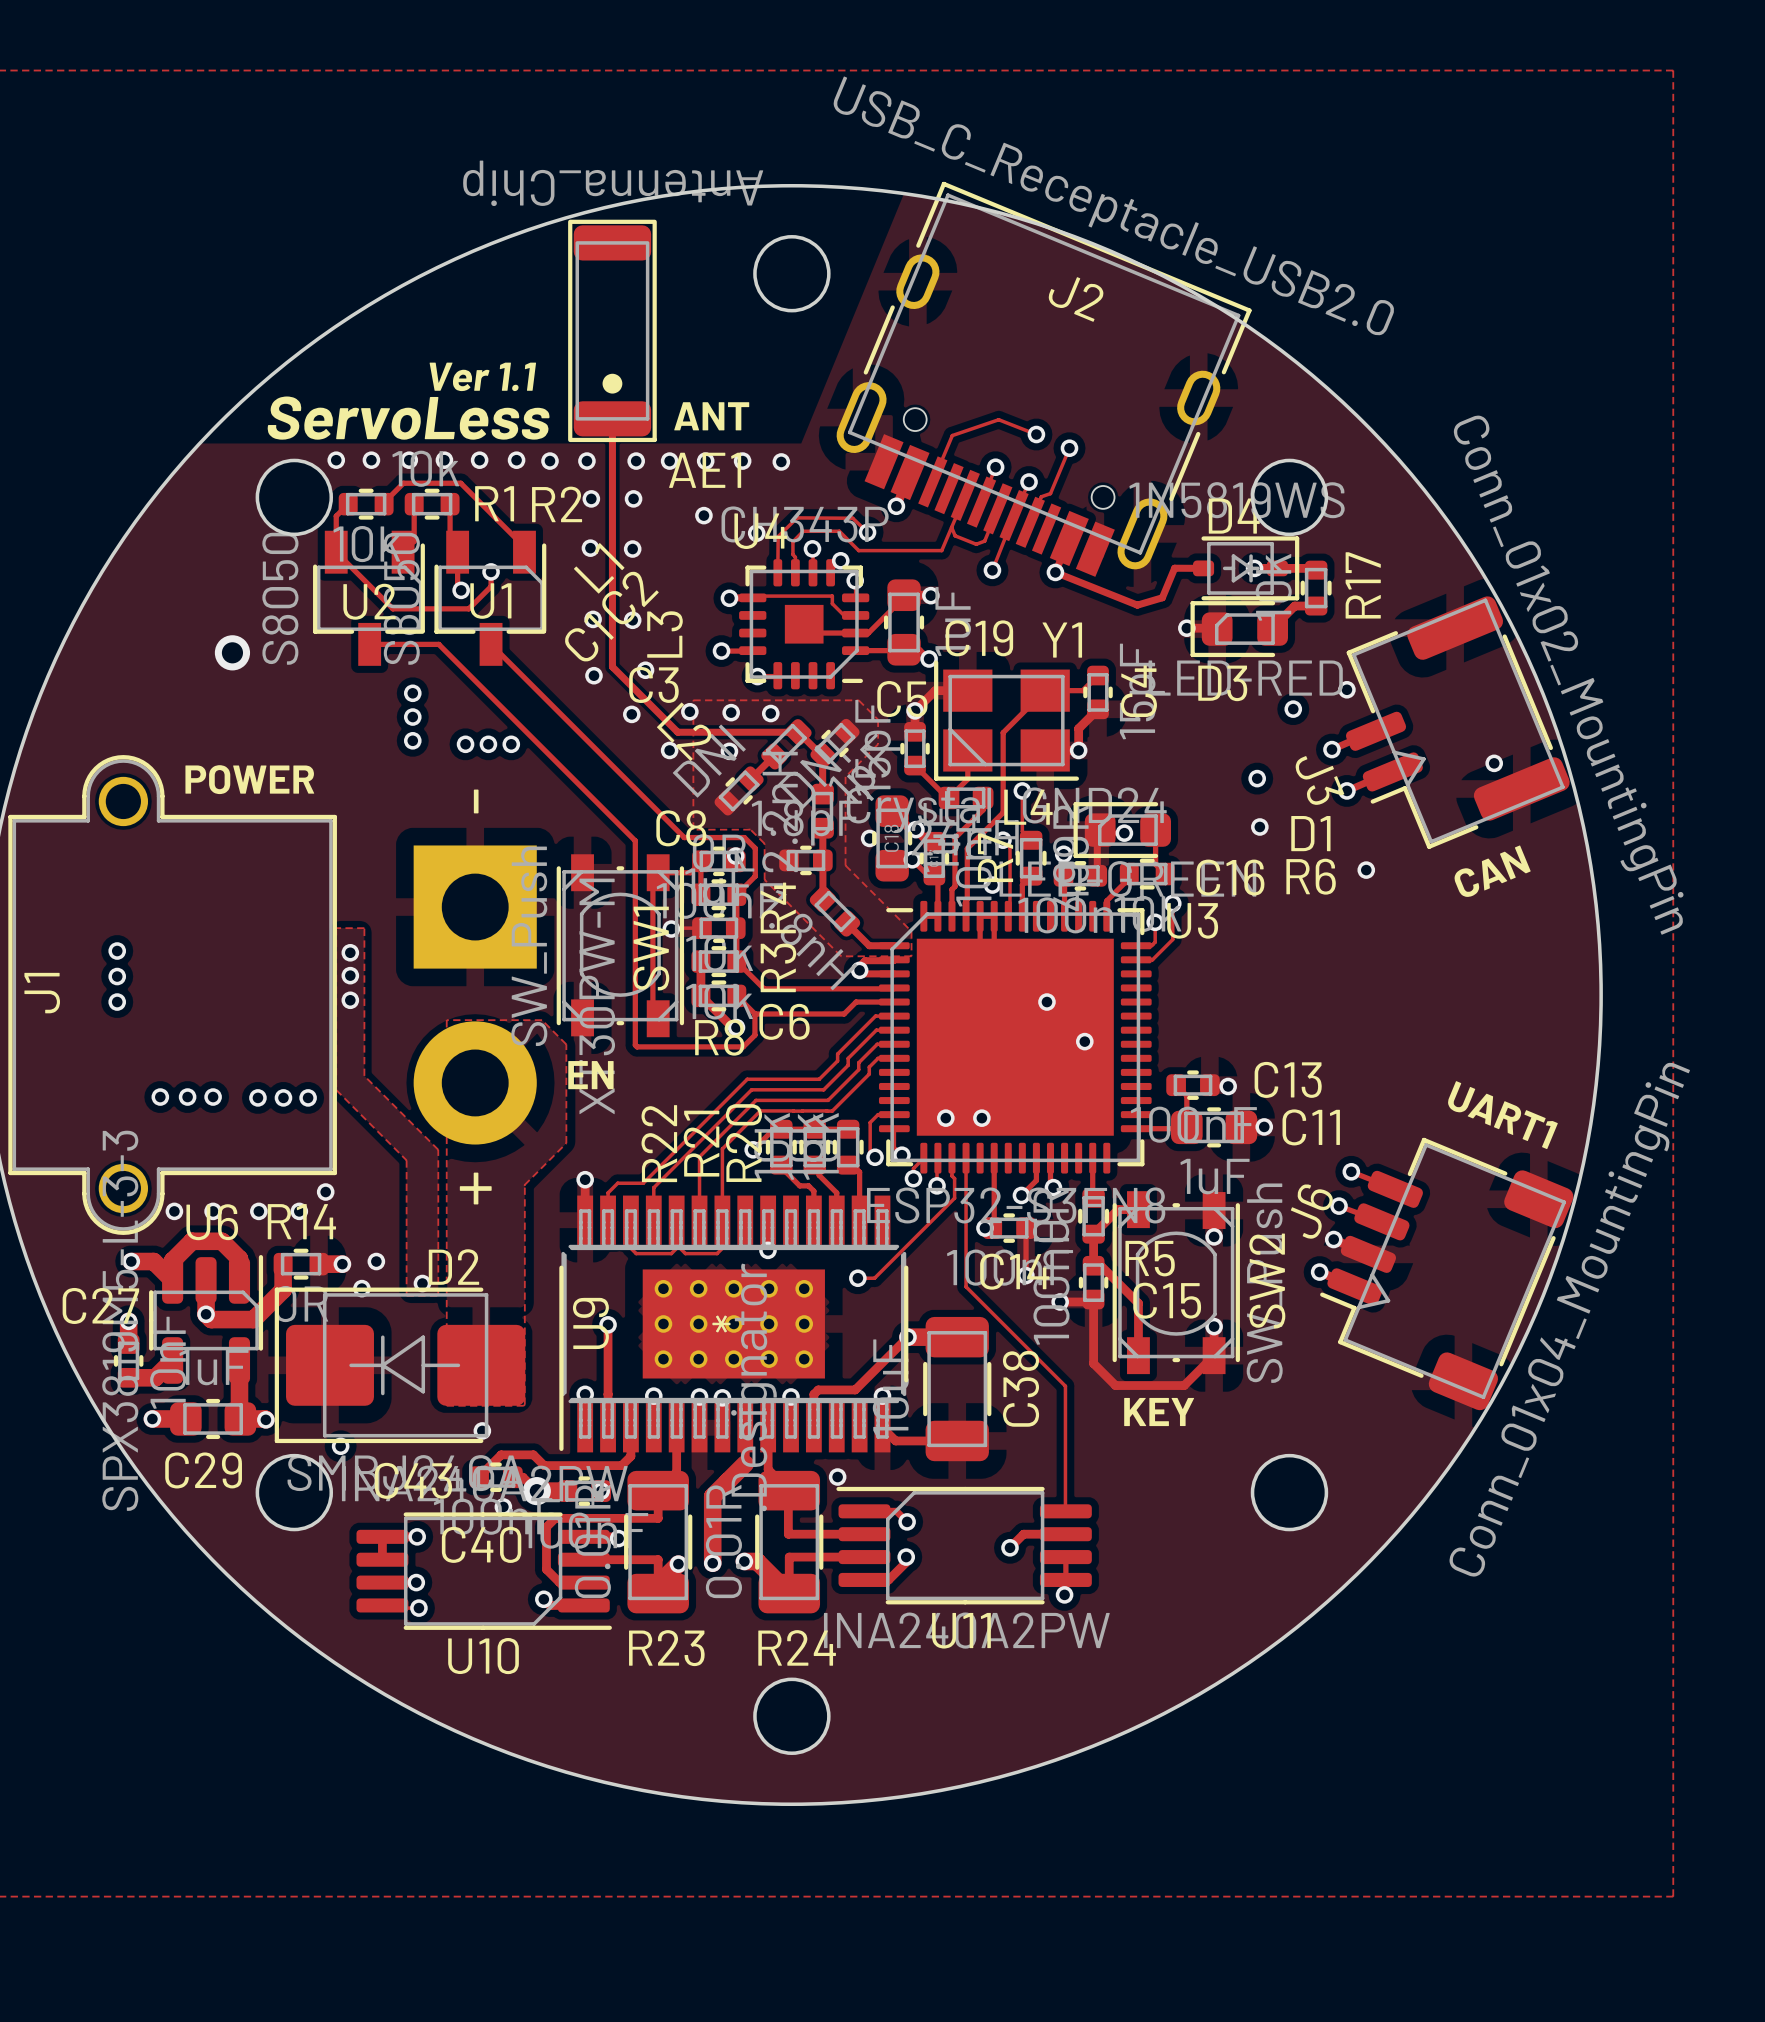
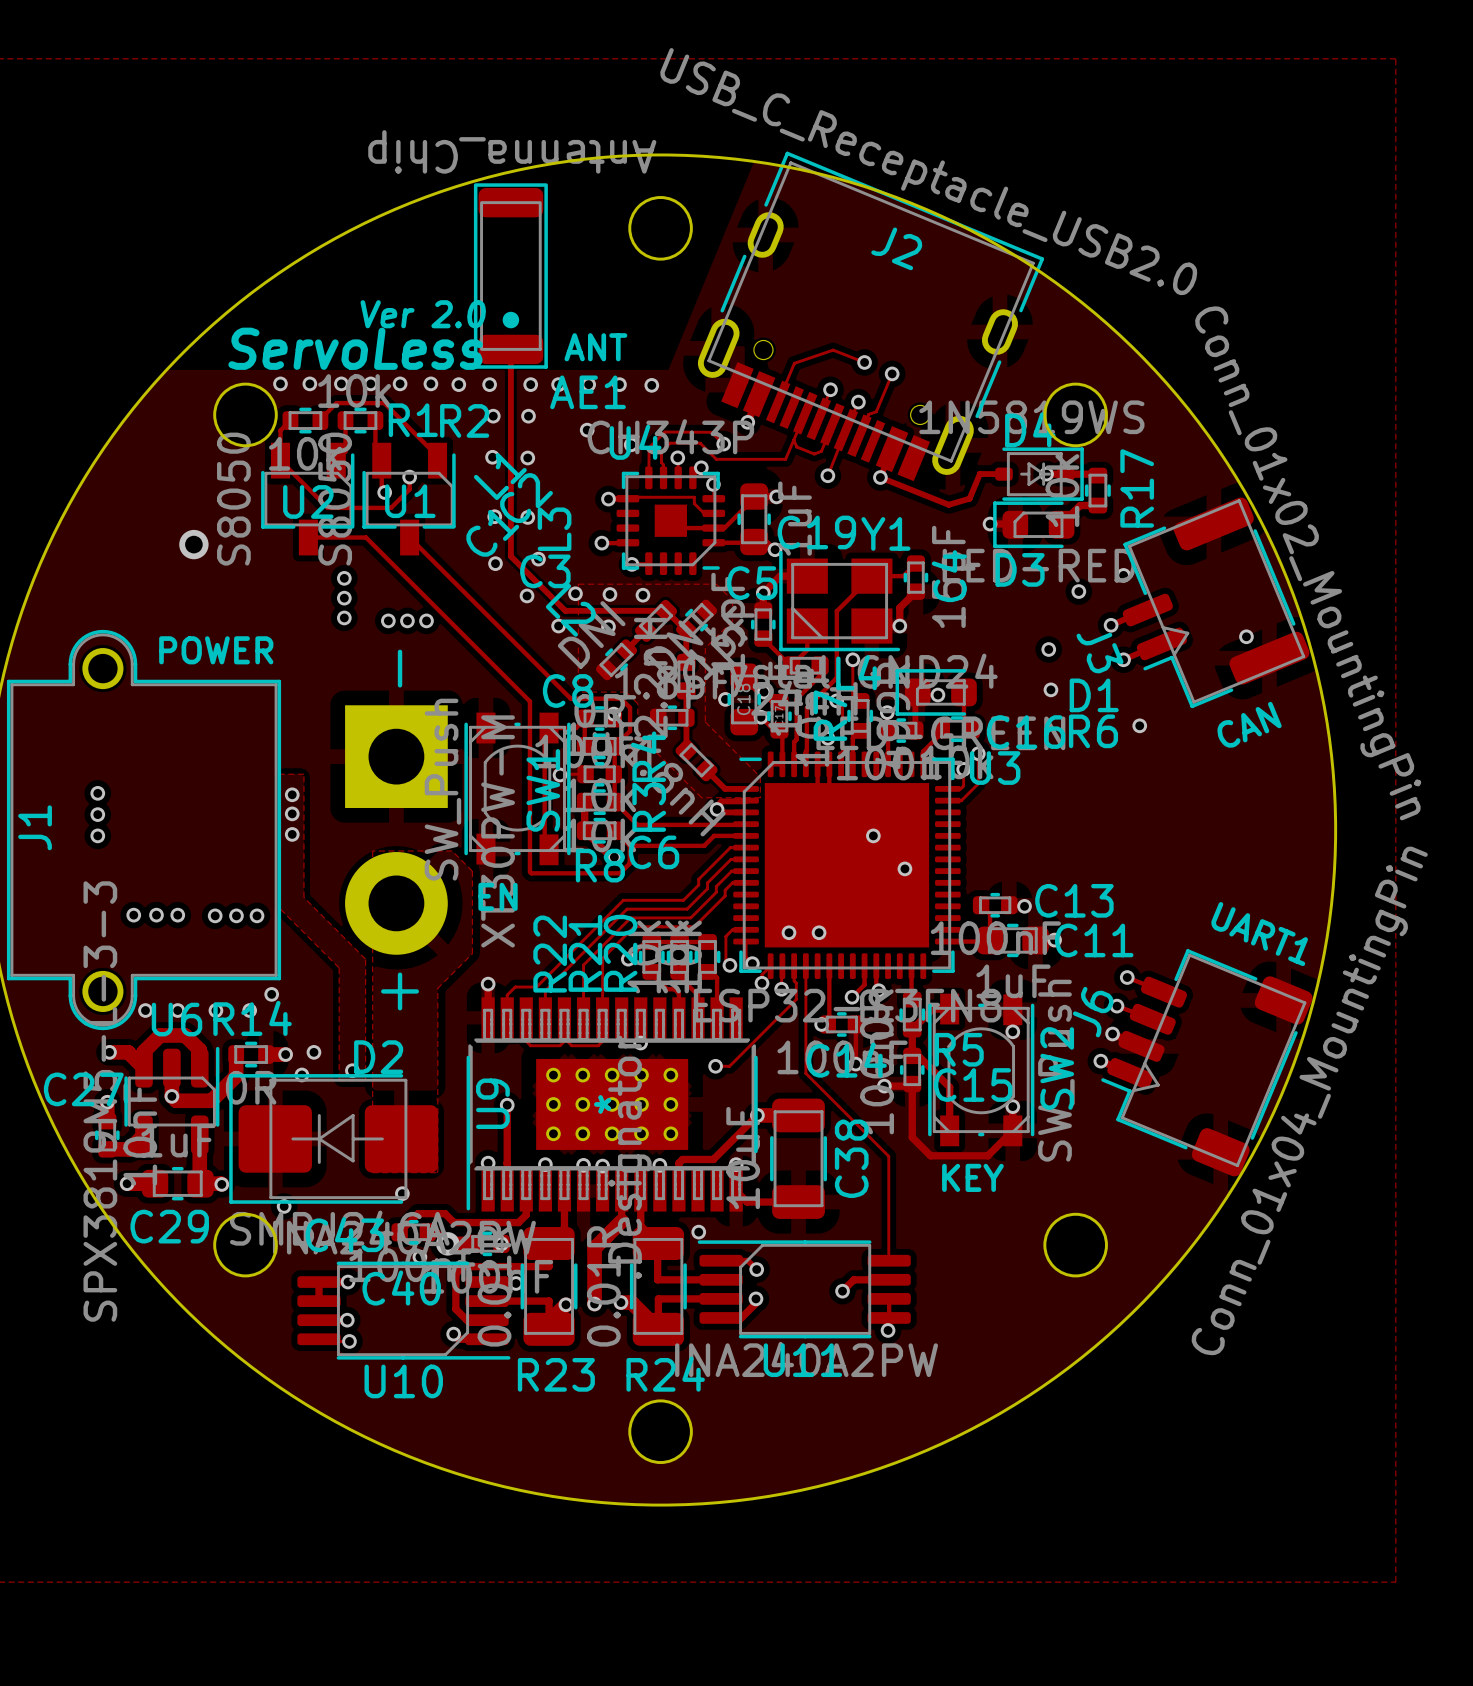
text: Ver 1.1 (482, 376) -> Ver 2.0 (423, 314)

